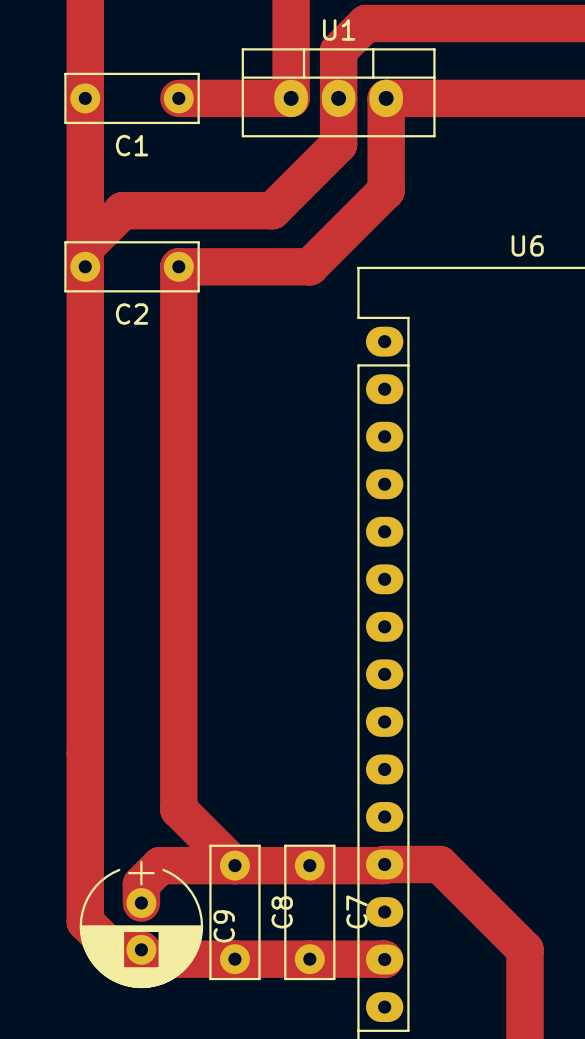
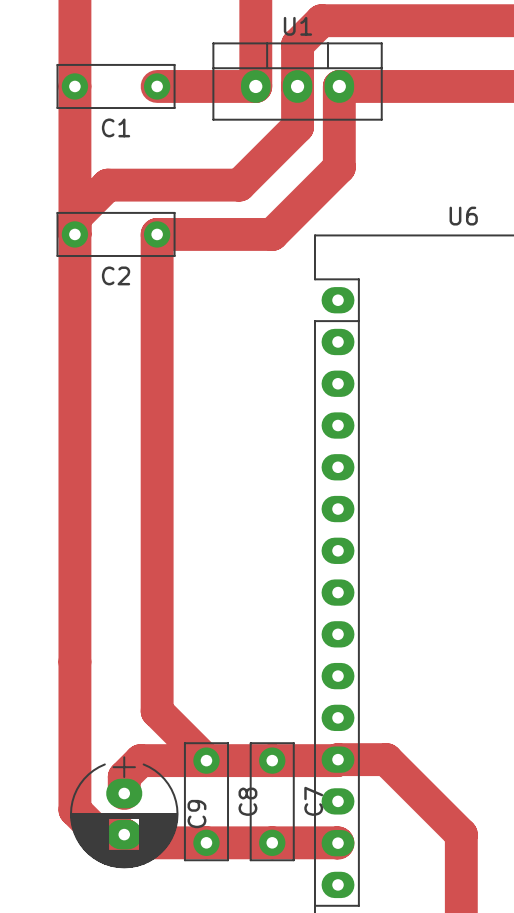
C9 footprint: [79, 860, 204, 989] -> [69, 756, 179, 869]

